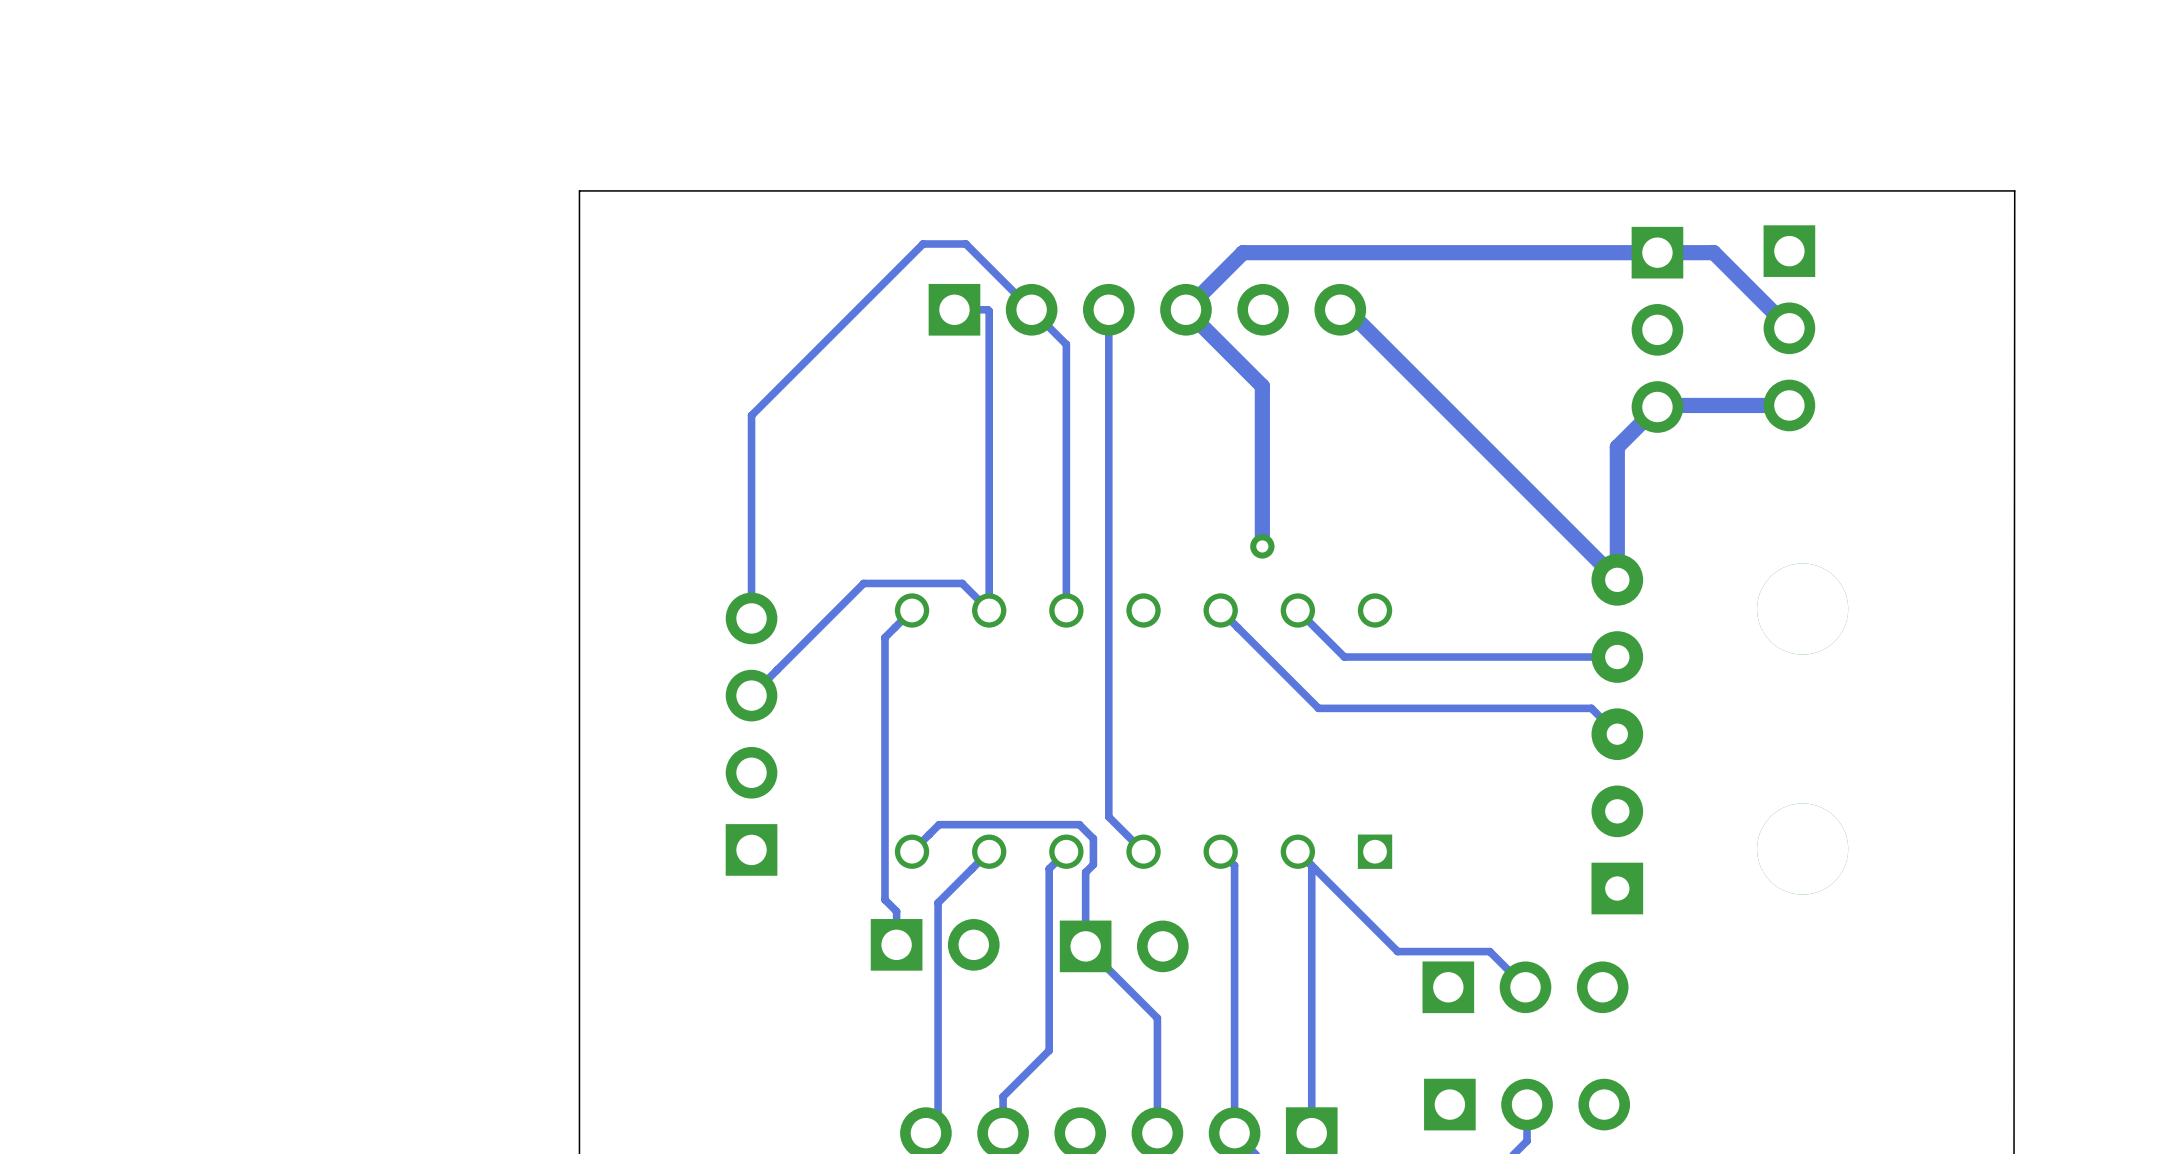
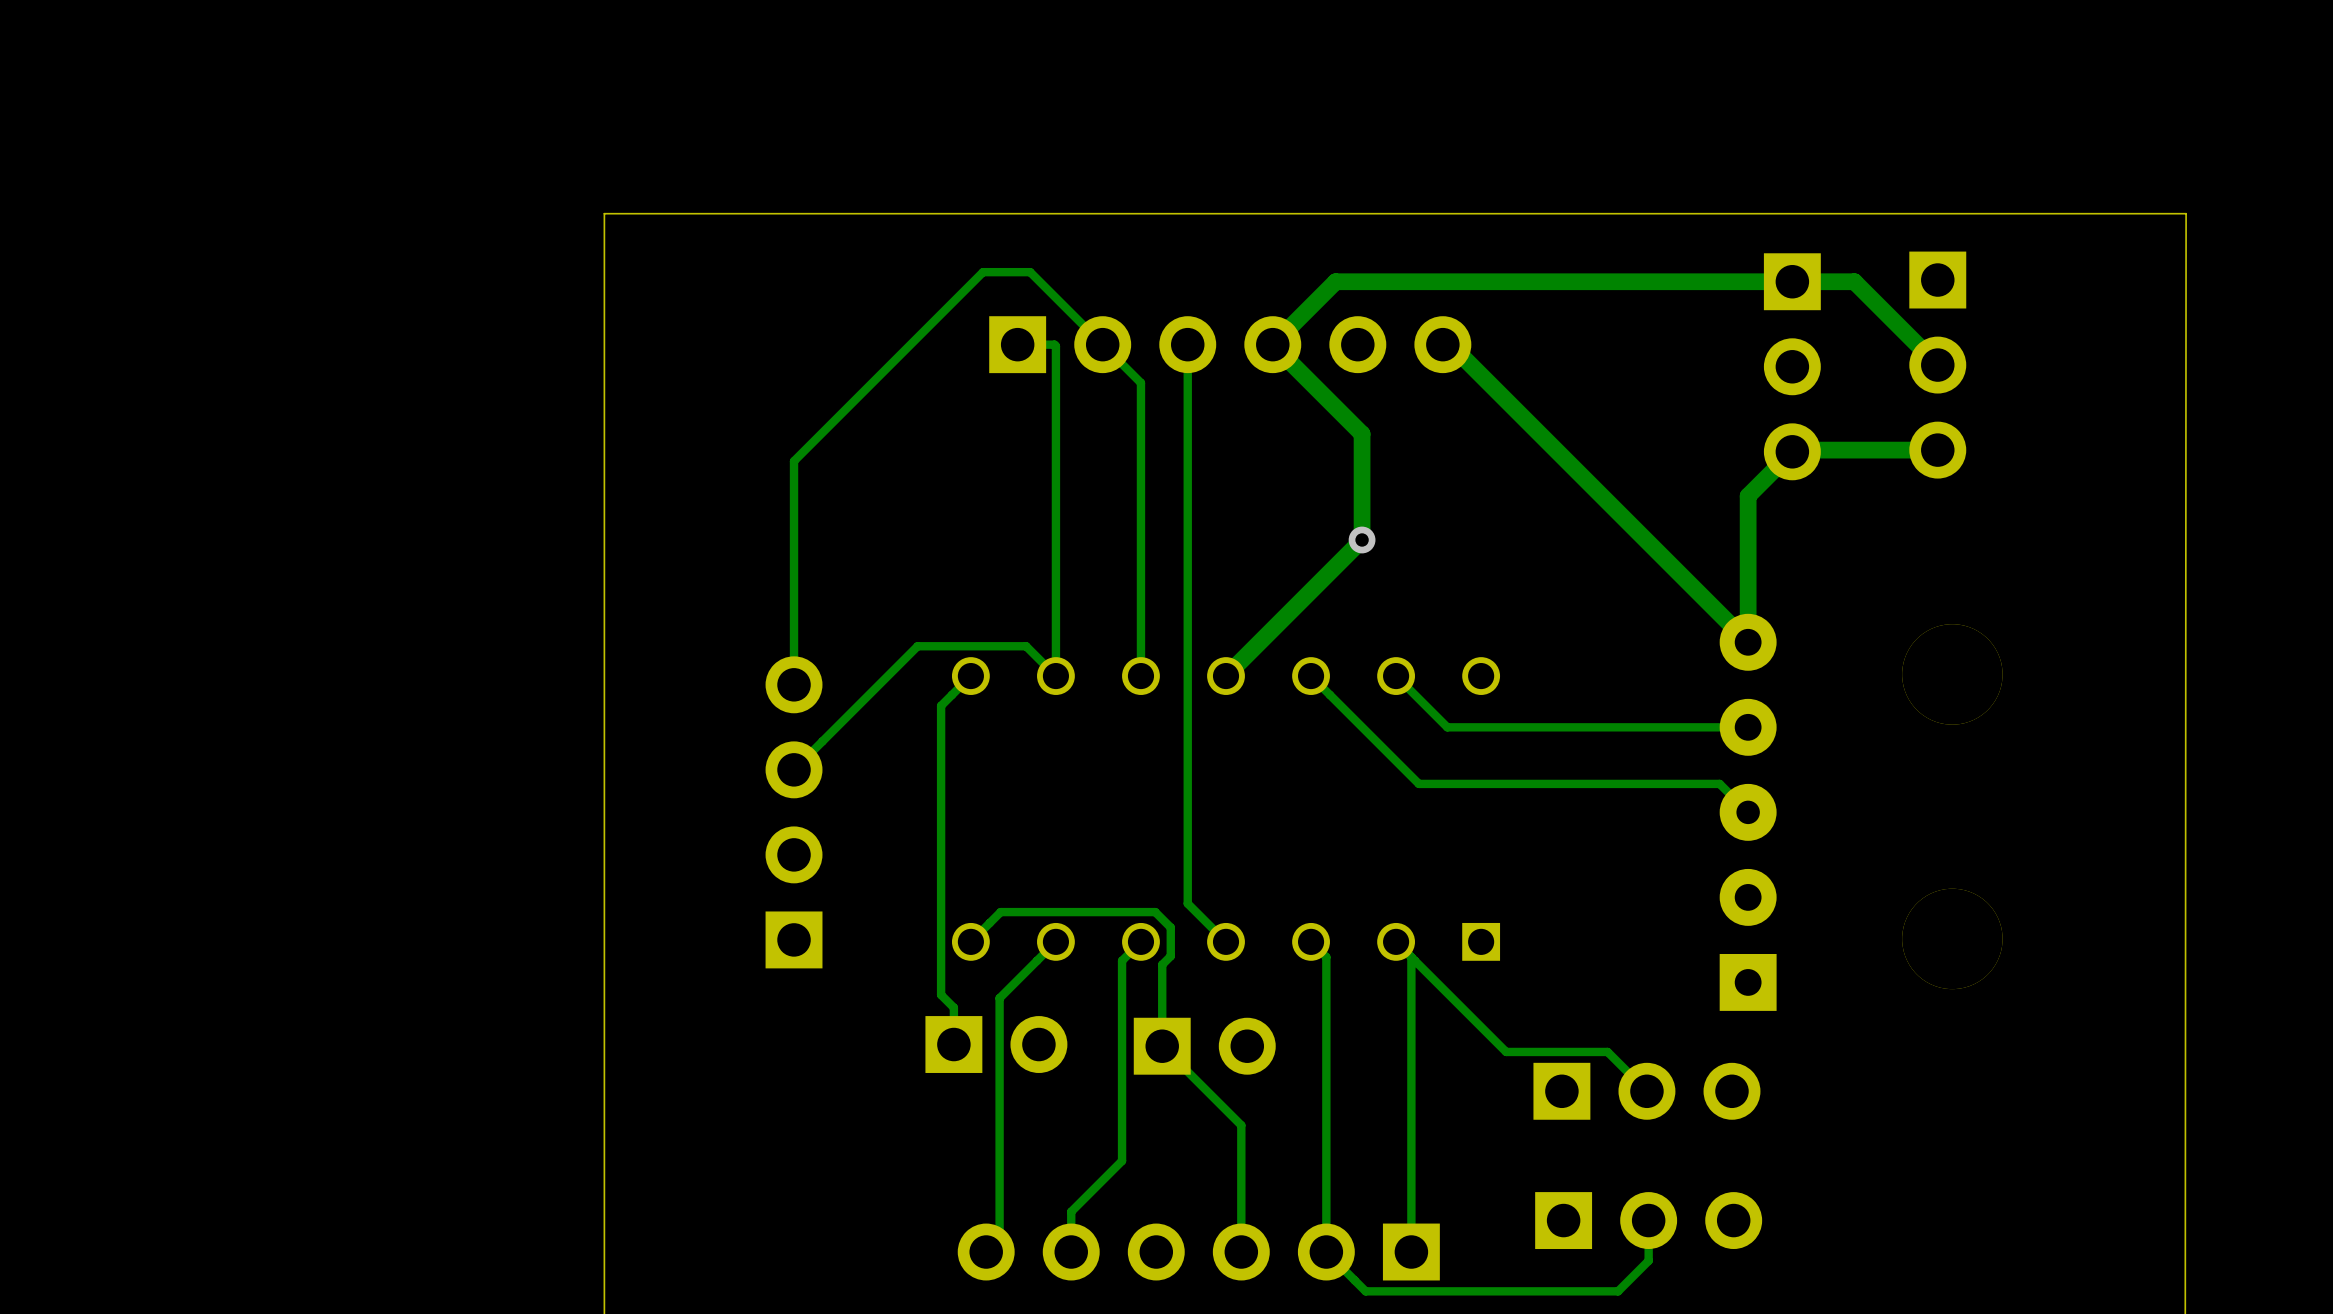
track: (1262, 386) (1262, 546) -> (1356, 428) (1362, 433) (1362, 539) (1226, 676)
via position: (1262, 546) -> (1362, 539)

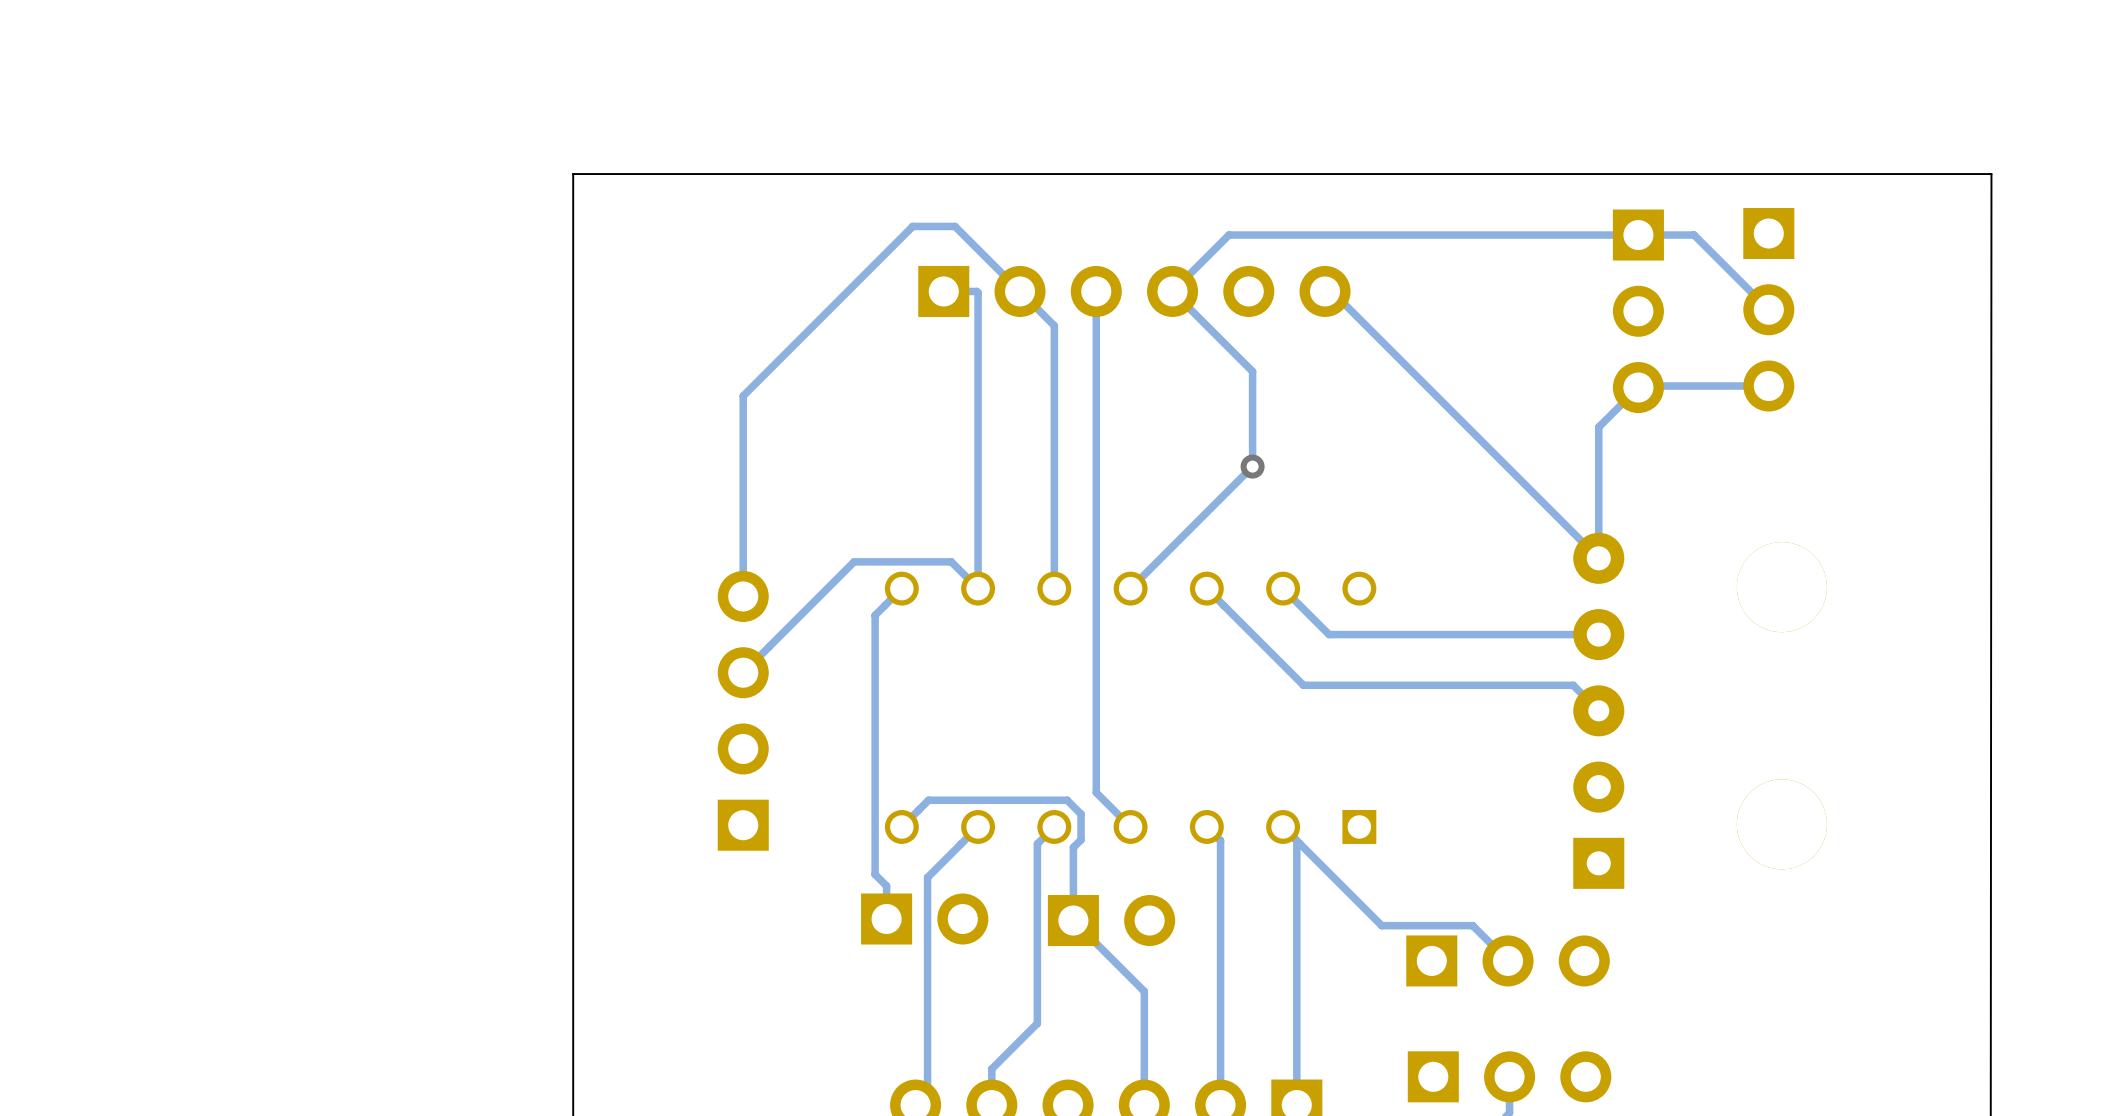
track width: thick (1445, 339) (1748, 642) (1748, 496) (1792, 451) -> thin (1327, 286) (1598, 558) (1598, 427) (1638, 387)
track width: thick (1937, 365) (1854, 281) (1335, 281) (1272, 344) (1362, 433) (1362, 539) (1226, 676) -> thin (1768, 309) (1694, 235) (1228, 235) (1172, 291) (1252, 371) (1252, 466) (1130, 588)
track width: thick (1937, 450) (1794, 450) -> thin (1768, 386) (1639, 386)

